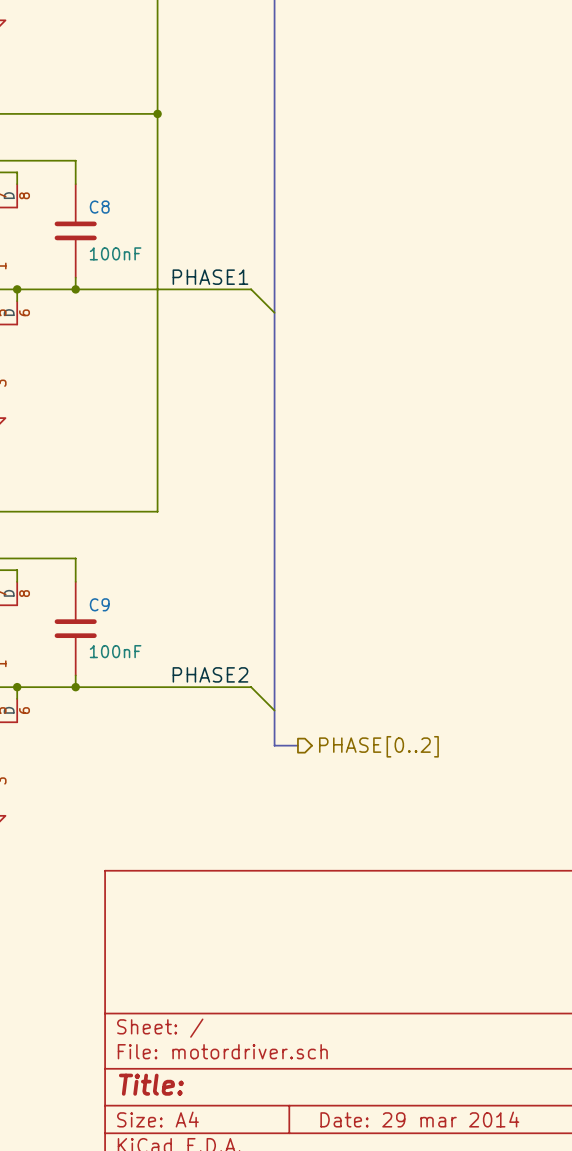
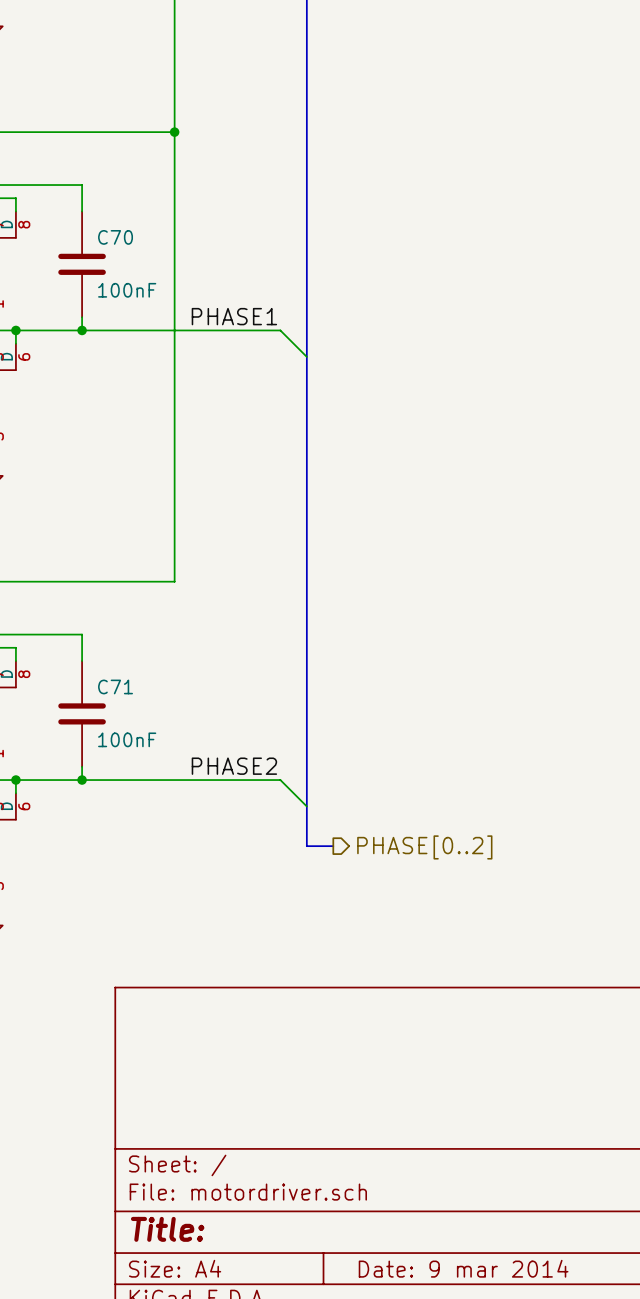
C8 name: C8 (99, 207) -> C70 (115, 237)
C9 name: C9 (99, 604) -> C71 (115, 686)
title block: Date: 29 mar 2014 (419, 1119) -> Date: 9 mar 2014 (463, 1268)

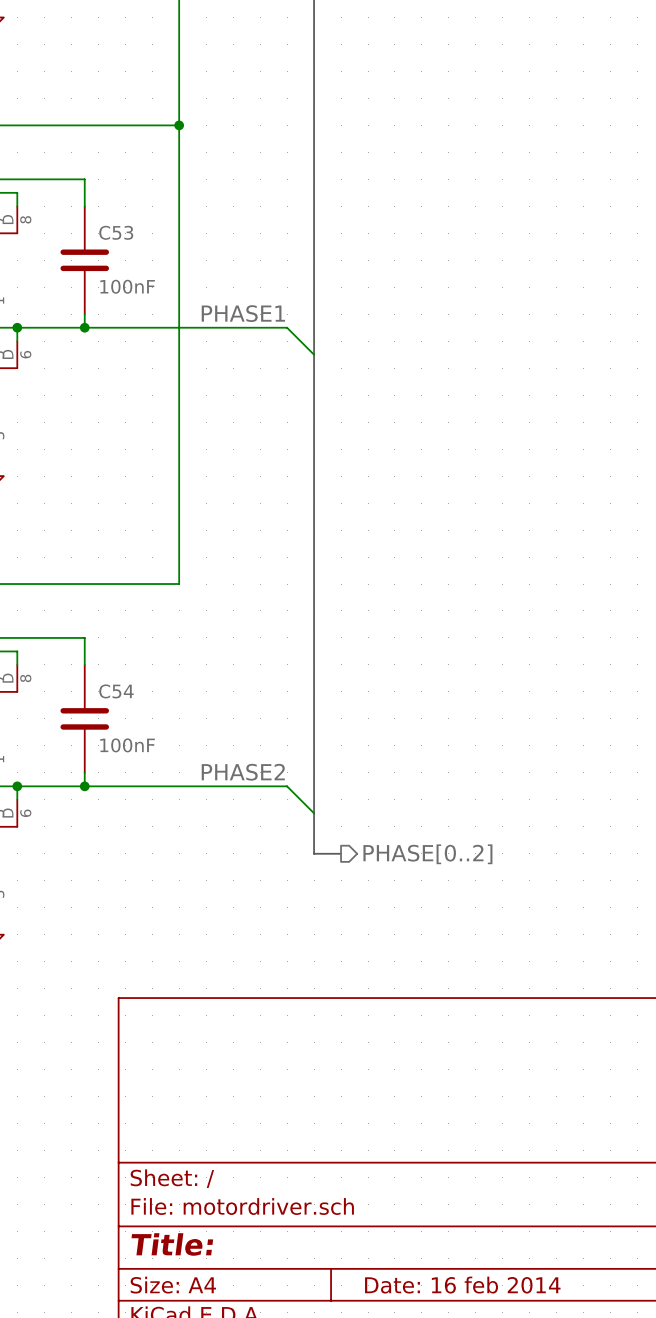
C70 name: C70 (115, 237) -> C53 (116, 232)
C71 name: C71 (115, 686) -> C54 (116, 691)
title block: Date: 9 mar 2014 (463, 1268) -> Date: 16 feb 2014 (462, 1285)

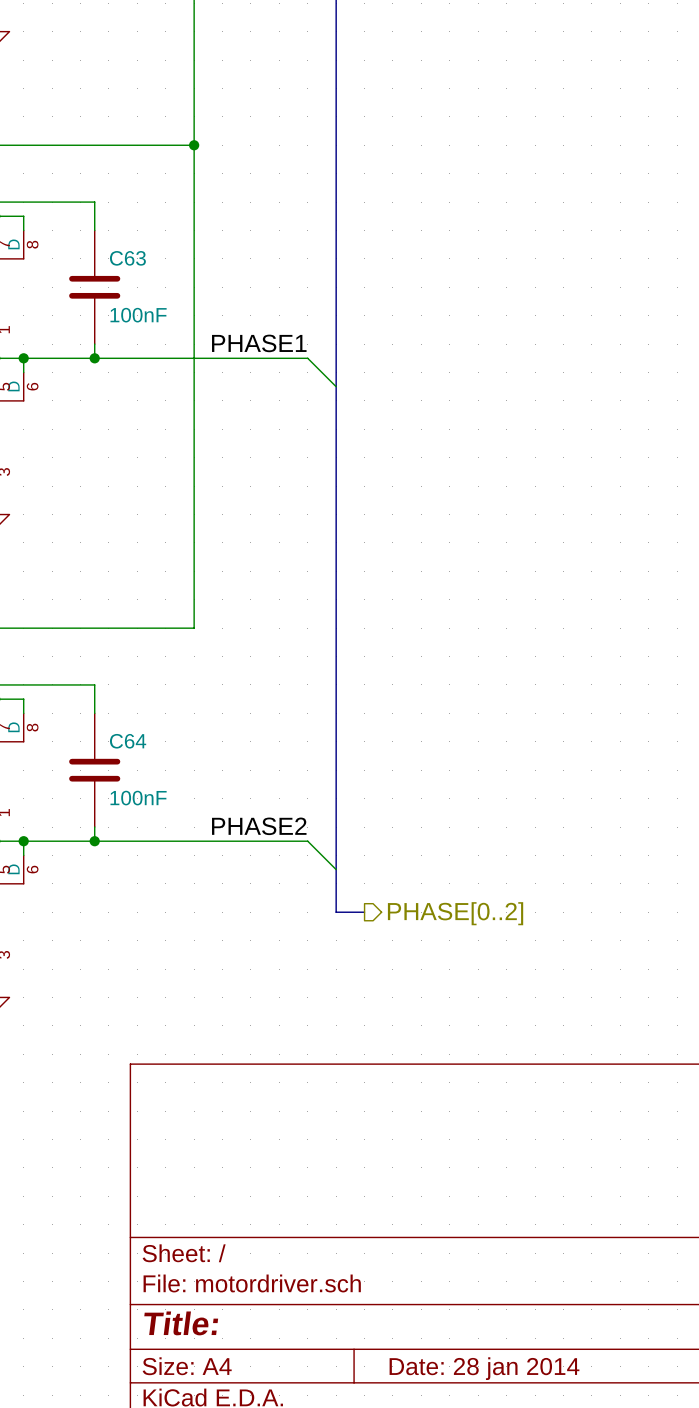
C53 name: C53 (116, 232) -> C63 (127, 258)
C54 name: C54 (116, 691) -> C64 (128, 741)
title block: Date: 16 feb 2014 (462, 1285) -> Date: 28 jan 2014 (484, 1368)

